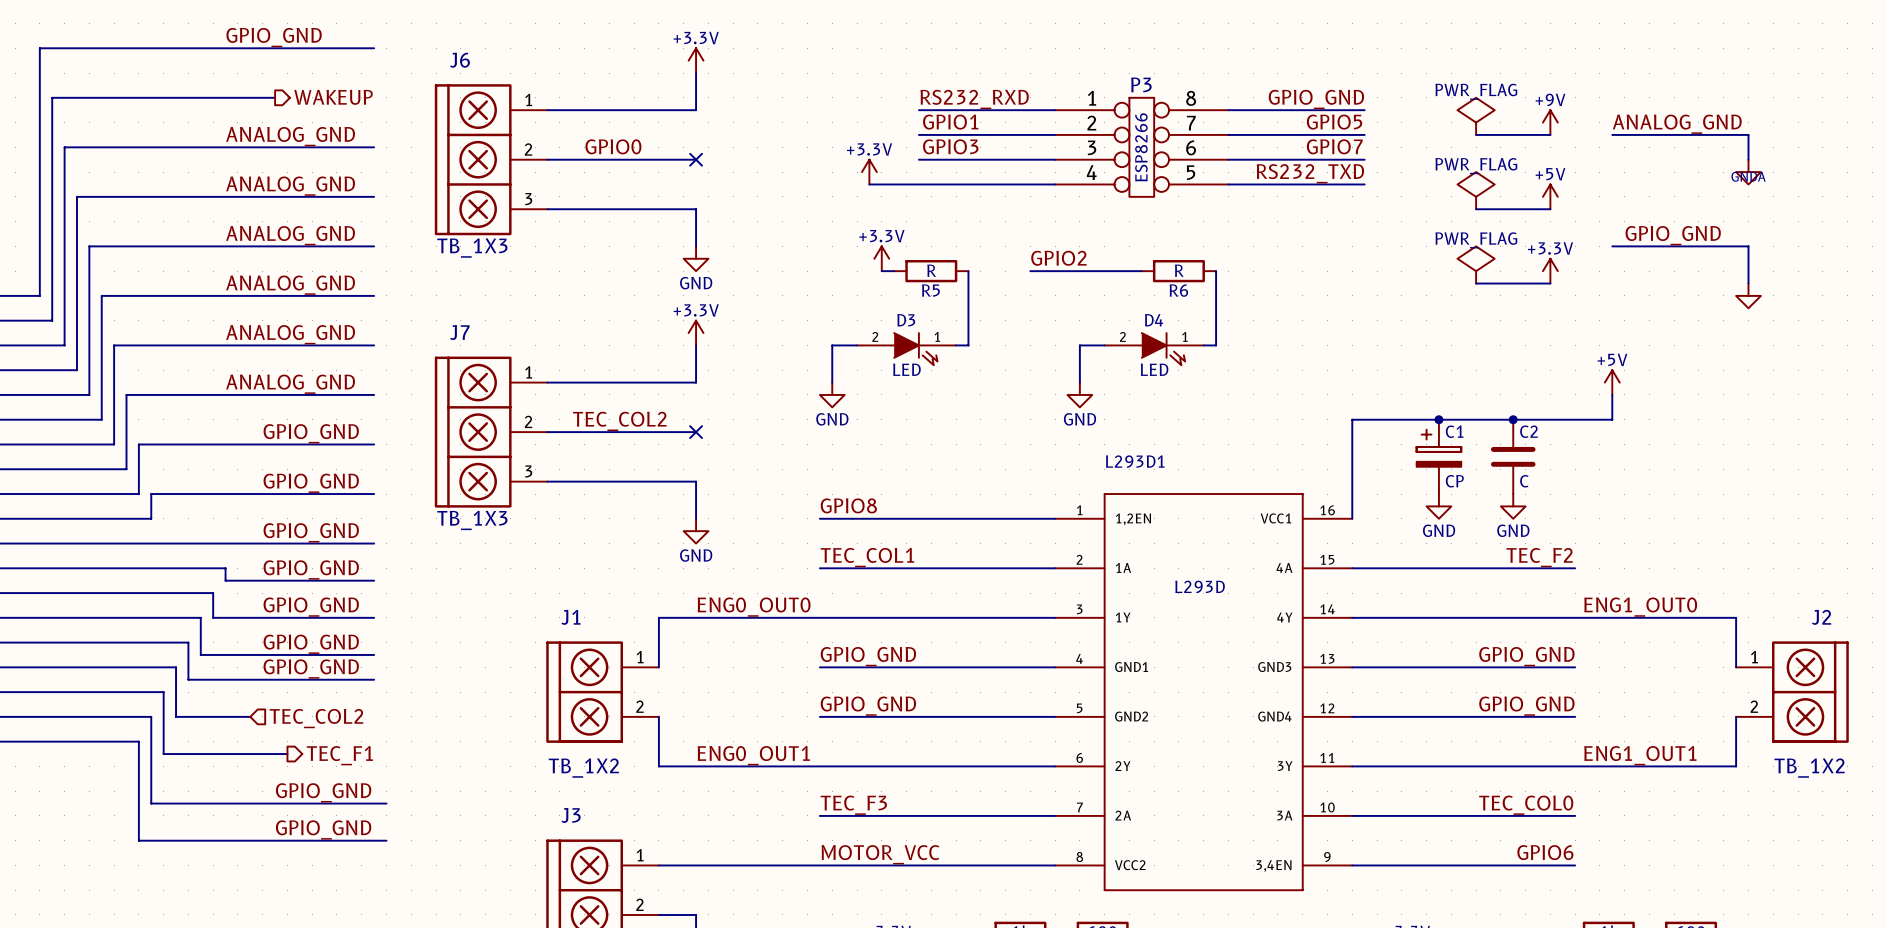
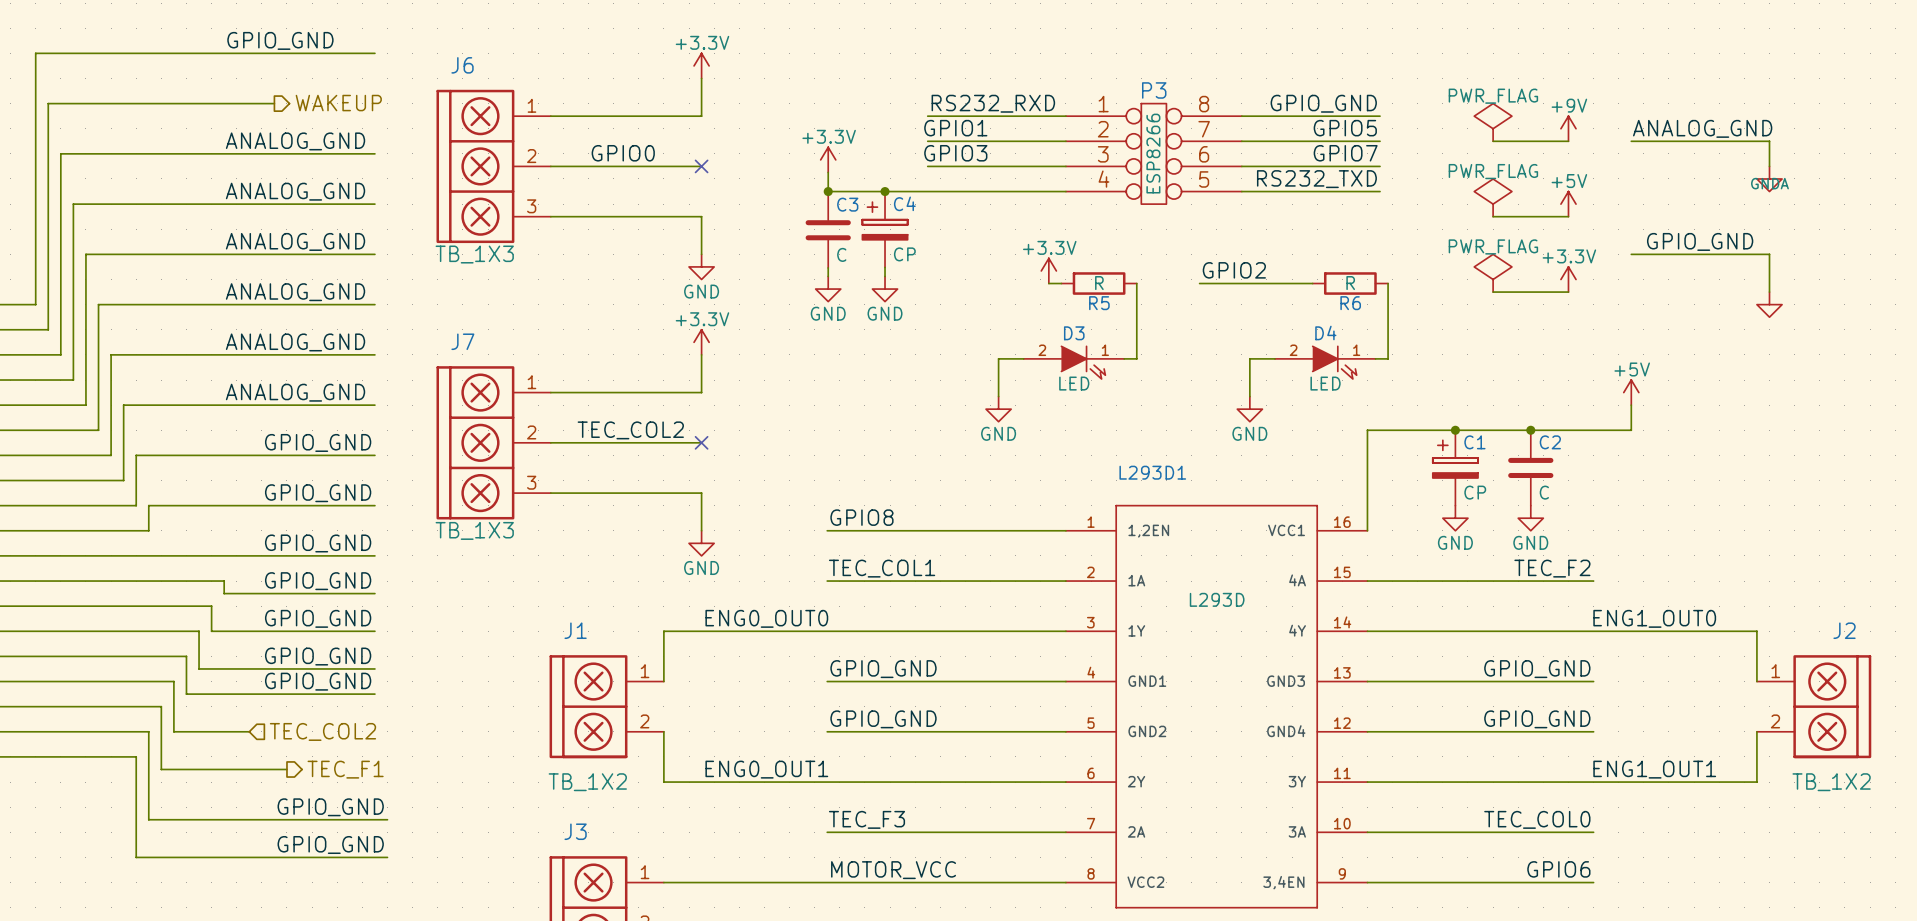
wire: none -> (828, 172) (828, 192)
power symbol position: +3.3V (869, 172) -> +3.3V (828, 159)
wire: none -> (828, 191) (877, 191)
junction: none -> (828, 191)
junction: none -> (885, 191)
C3: none -> C (828, 230)
C4: none -> CP (885, 229)
power symbol: +3.3V (881, 258) -> none
label position: GPIO2 (1058, 258) -> GPIO2 (1234, 270)
wire: none -> (828, 267) (828, 276)
wire: none -> (885, 267) (885, 276)
power symbol: none -> +3.3V (1048, 270)
wire: (881, 271) (894, 271) -> (1048, 283) (1061, 283)
R5 position: (931, 271) -> (1099, 283)
wire: (968, 271) (968, 345) (956, 345) -> (1136, 283) (1136, 358) (1124, 358)
wire: (1030, 271) (1141, 271) -> (1199, 283) (1312, 283)
R6 position: (1178, 271) -> (1350, 283)
wire: (1216, 271) (1216, 345) (1203, 345) -> (1388, 283) (1388, 358) (1375, 358)
power symbol: none -> GND (828, 289)
power symbol: none -> GND (885, 289)
wire: (857, 345) (832, 345) (832, 382) -> (1023, 358) (998, 358) (998, 396)
wire: (1104, 345) (1079, 345) (1079, 382) -> (1274, 358) (1249, 358) (1249, 396)
D3 position: (906, 349) -> (1073, 362)
D4 position: (1154, 349) -> (1325, 362)
power symbol: GND (832, 394) -> none
power symbol: GND (1079, 394) -> none
power symbol: none -> GND (998, 409)
power symbol: none -> GND (1249, 409)

